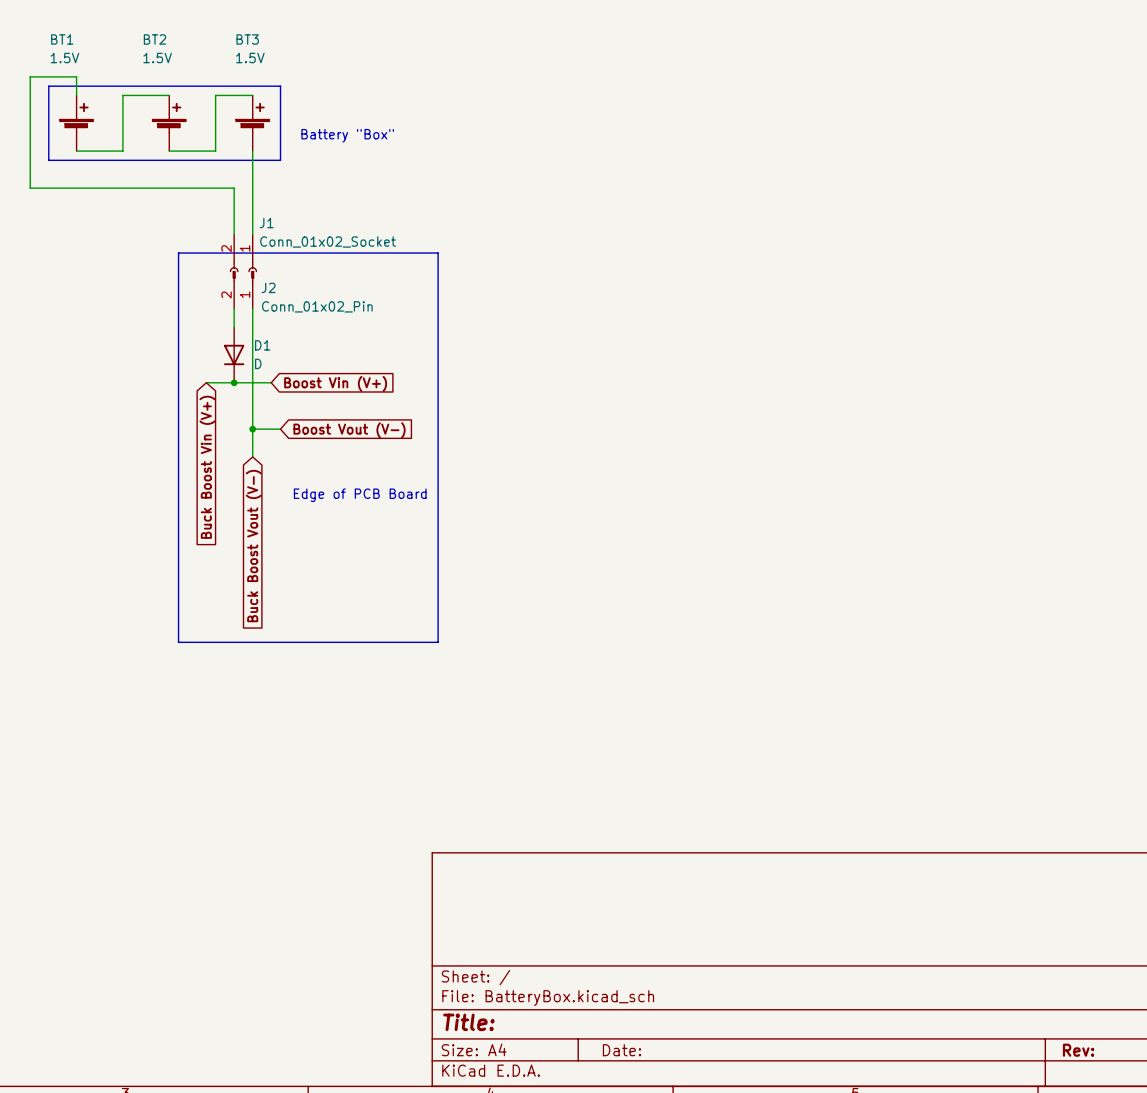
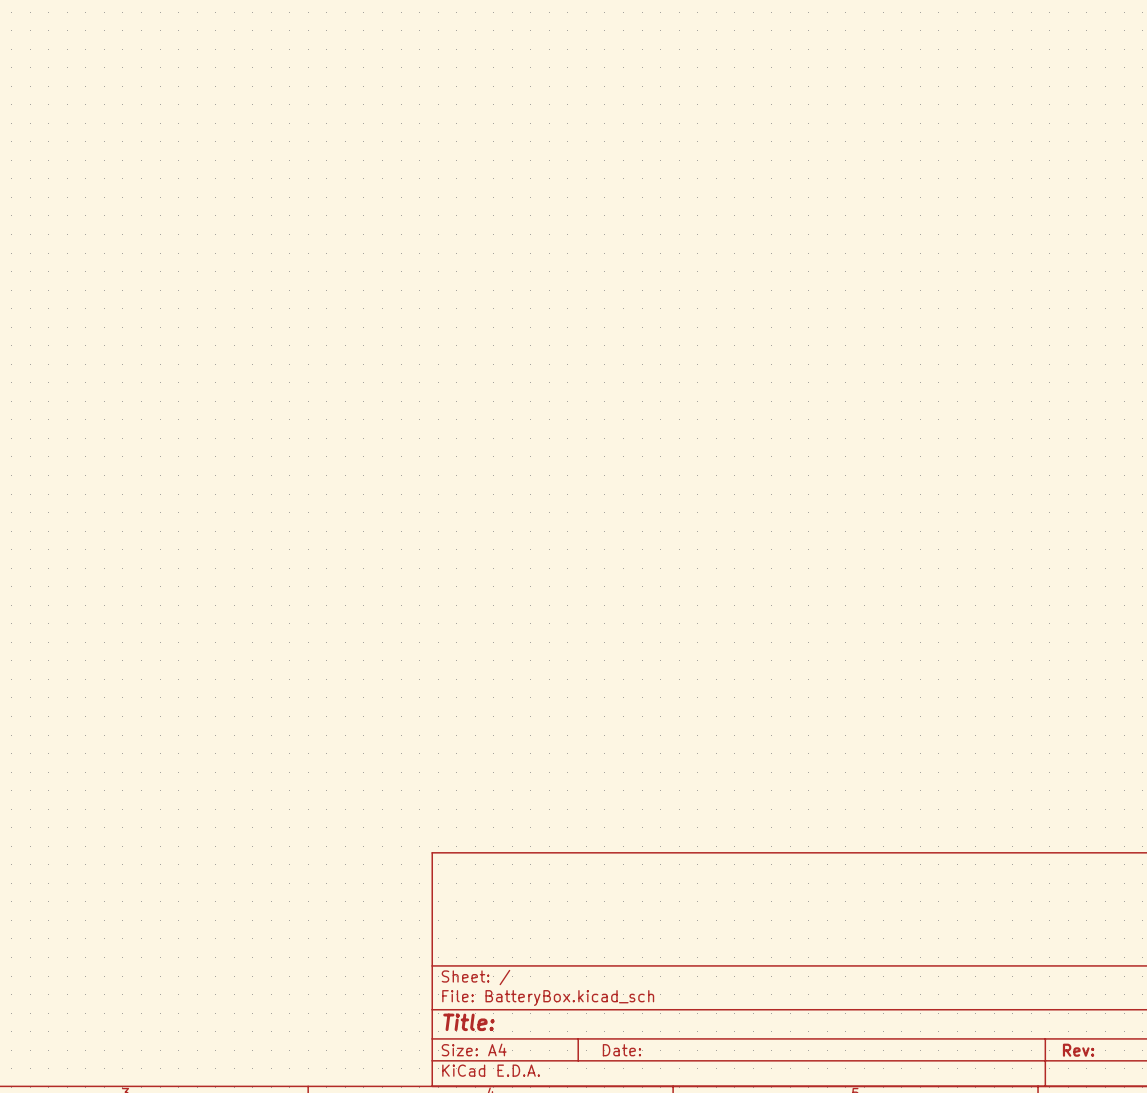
line: (48, 86) (280, 86) (280, 160) (48, 160) (48, 86) -> none
wire: (76, 95) (76, 76) (30, 76) (30, 188) (234, 188) (234, 234) -> none
wire: (169, 95) (122, 95) (122, 151) (76, 151) -> none
wire: (252, 95) (215, 95) (215, 151) (169, 151) -> none
BT1: 1.5V (76, 123) -> none
BT2: 1.5V (169, 123) -> none
BT3: 1.5V (252, 123) -> none
text: Battery "Box" (347, 135) -> none
wire: (252, 151) (252, 234) -> none
line: (178, 253) (438, 253) (438, 642) (178, 642) (178, 253) -> none
J1: Conn_01x02_Socket (243, 253) -> none
J2: Conn_01x02_Pin (243, 289) -> none
wire: (234, 308) (234, 327) -> none
wire: (252, 308) (252, 456) -> none
D1: D (234, 354) -> none
wire: (206, 382) (271, 382) -> none
junction: (234, 382) -> none
global label: Boost Vin (V+) (335, 383) -> none
wire: (252, 429) (280, 429) -> none
junction: (252, 429) -> none
global label: Boost Vout (V-) (349, 430) -> none
global label: Buck Boost Vin (V+) (207, 467) -> none
text: Edge of PCB Board (360, 495) -> none
global label: Buck Boost Vout (V-) (253, 546) -> none

